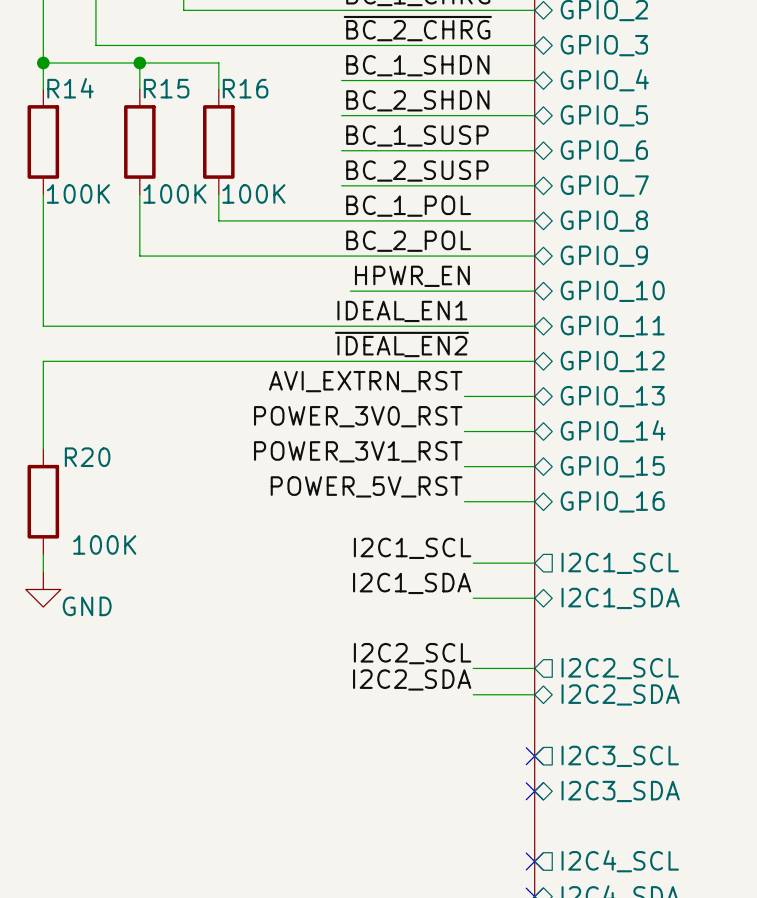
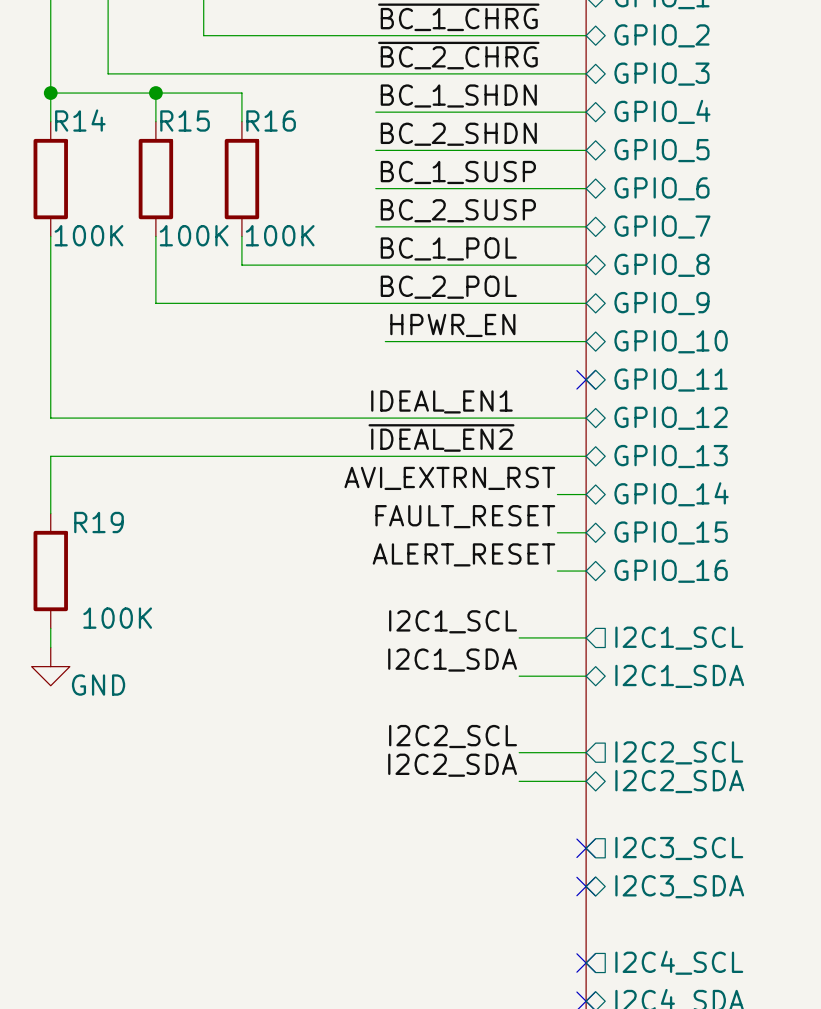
label: IDEAL_EN1 (402, 311) -> none
wire: (43, 326) (534, 326) -> none
no-connect mark: none -> (586, 379)
label: ~{IDEAL_EN2} (401, 344) -> IDEAL_EN1 (441, 401)
wire: (43, 361) (43, 396) -> (50, 418) (50, 379)
label: none -> ~{IDEAL_EN2} (441, 437)
label position: AVI_EXTRN_RST (365, 381) -> AVI_EXTRN_RST (449, 478)
wire: none -> (50, 456) (509, 456)
label: POWER_3V0_RST (358, 416) -> none
wire: (464, 431) (508, 431) -> none
label: POWER_3V1_RST (358, 451) -> none
label: none -> FAULT_RESET (465, 516)
R20 name: R20 (87, 457) -> R19 (99, 522)
wire: (464, 466) (508, 466) -> none
label: POWER_5V_RST (366, 486) -> none
label: none -> ALERT_RESET (463, 554)
wire: (464, 501) (508, 501) -> none

